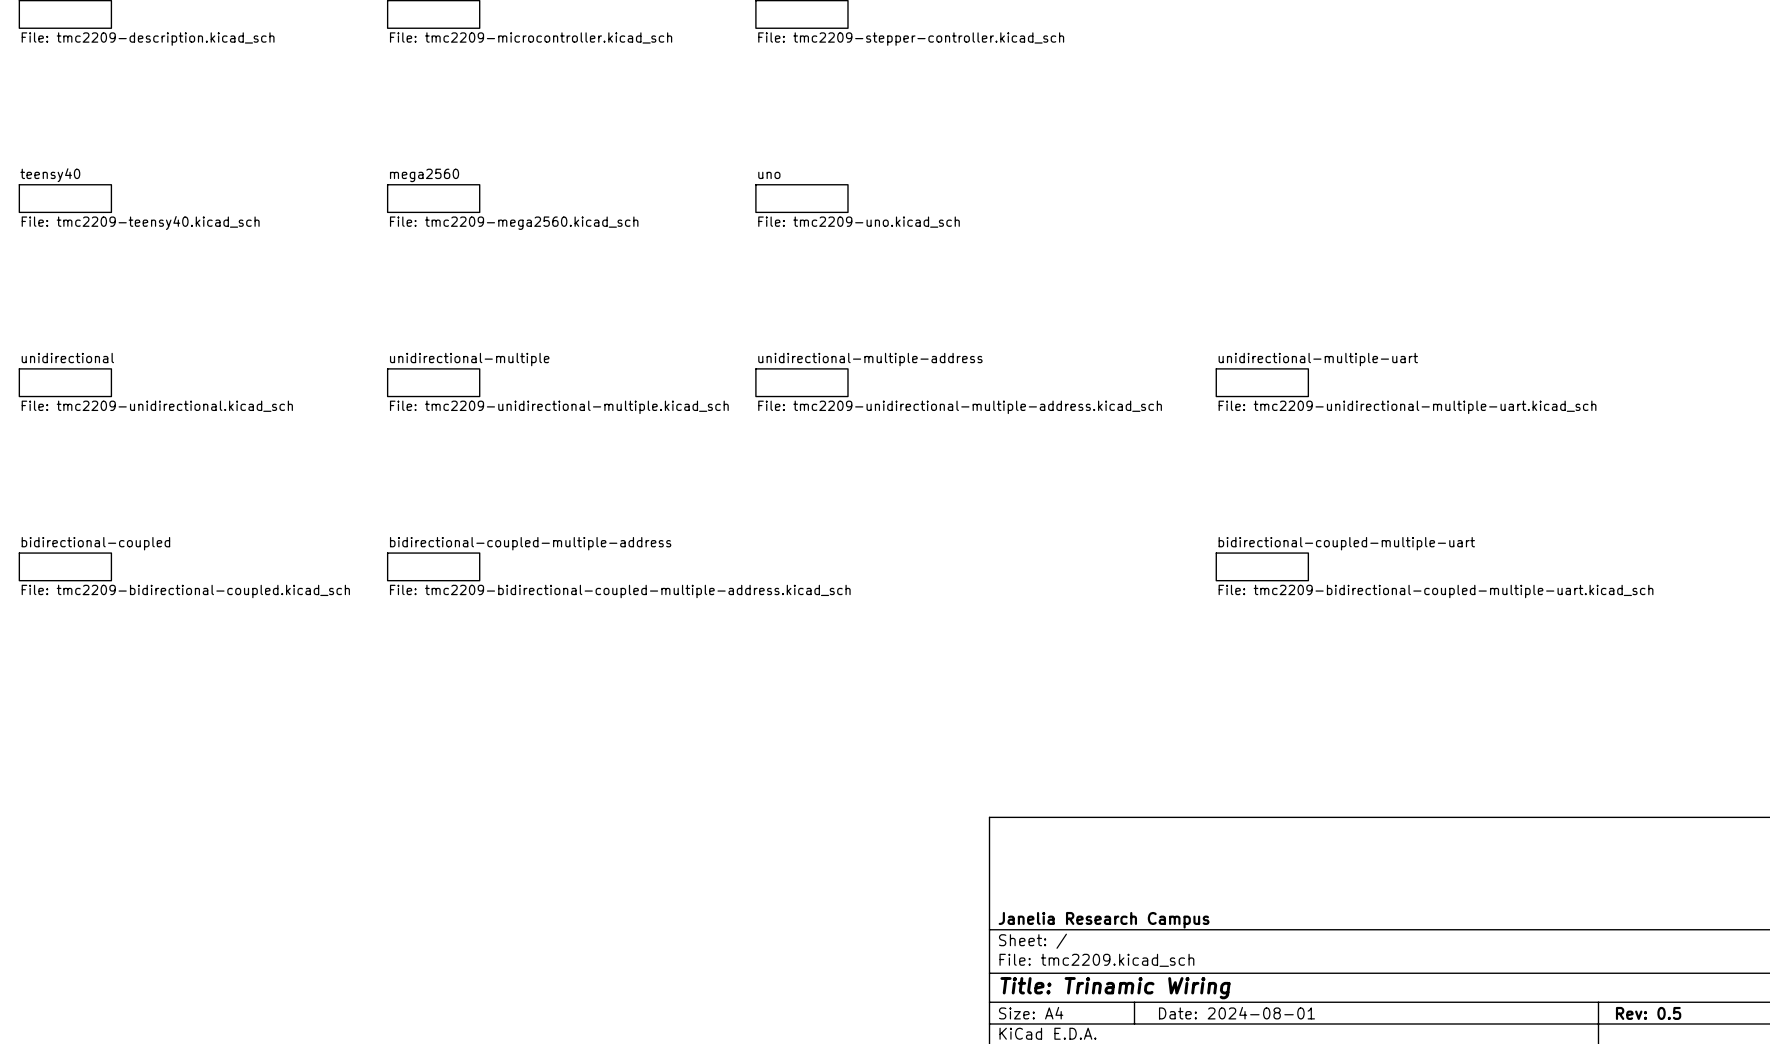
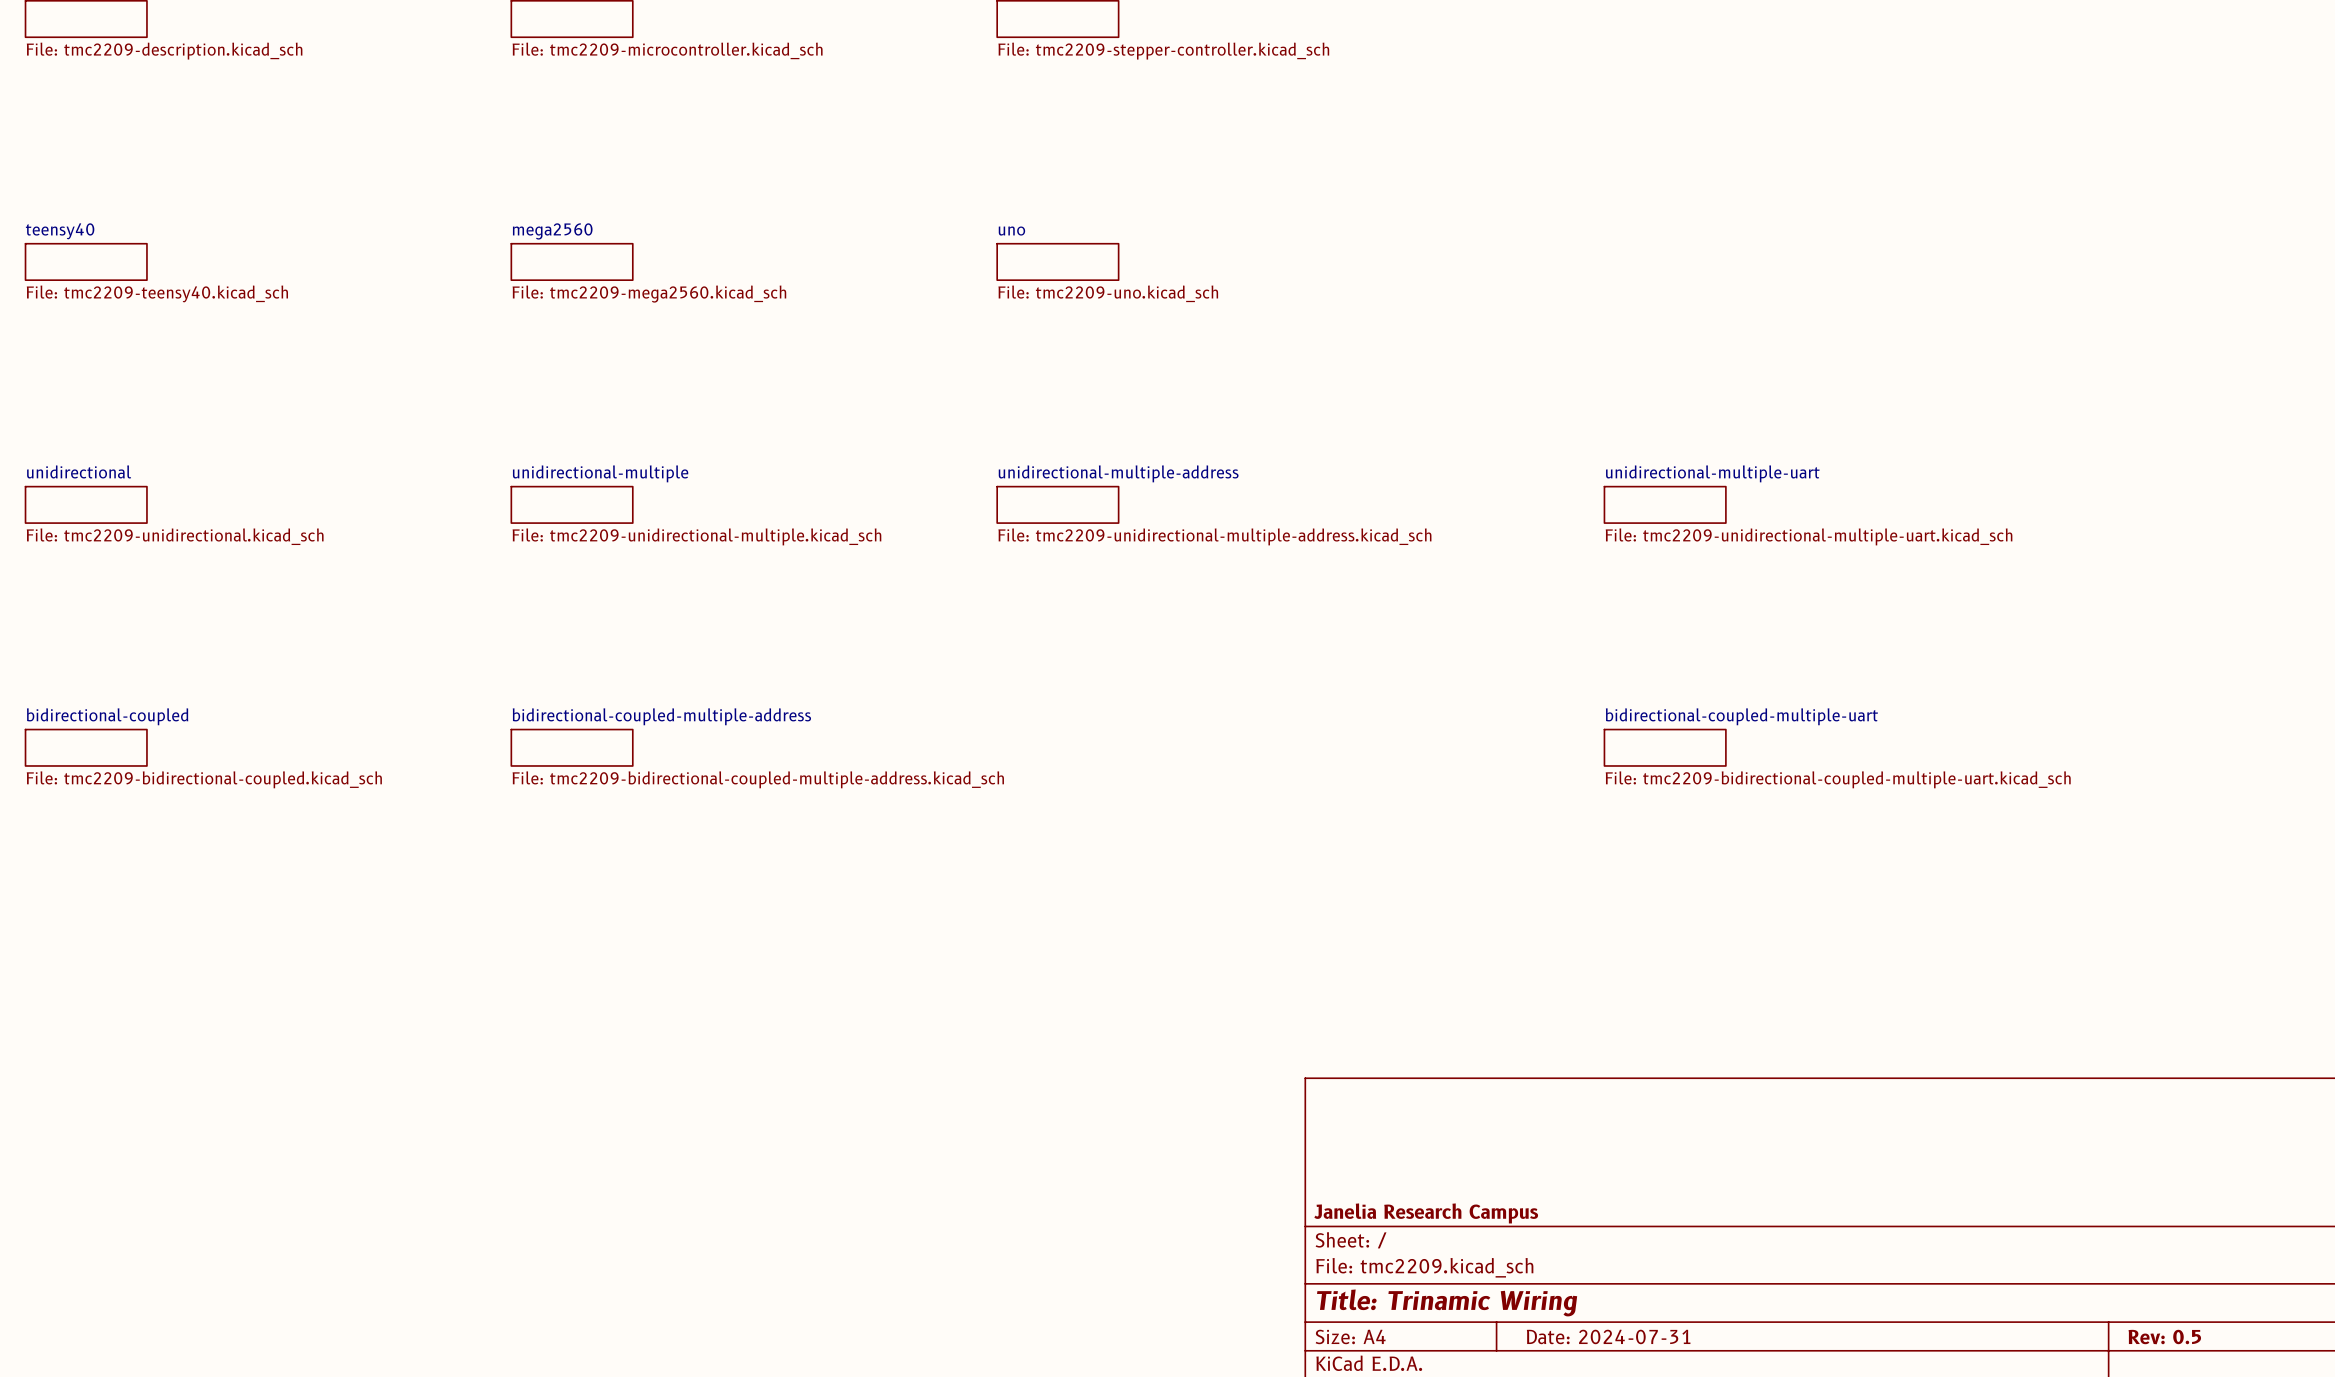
title block: Date: 2024-08-01 (1236, 1013) -> Date: 2024-07-31 (1608, 1336)

